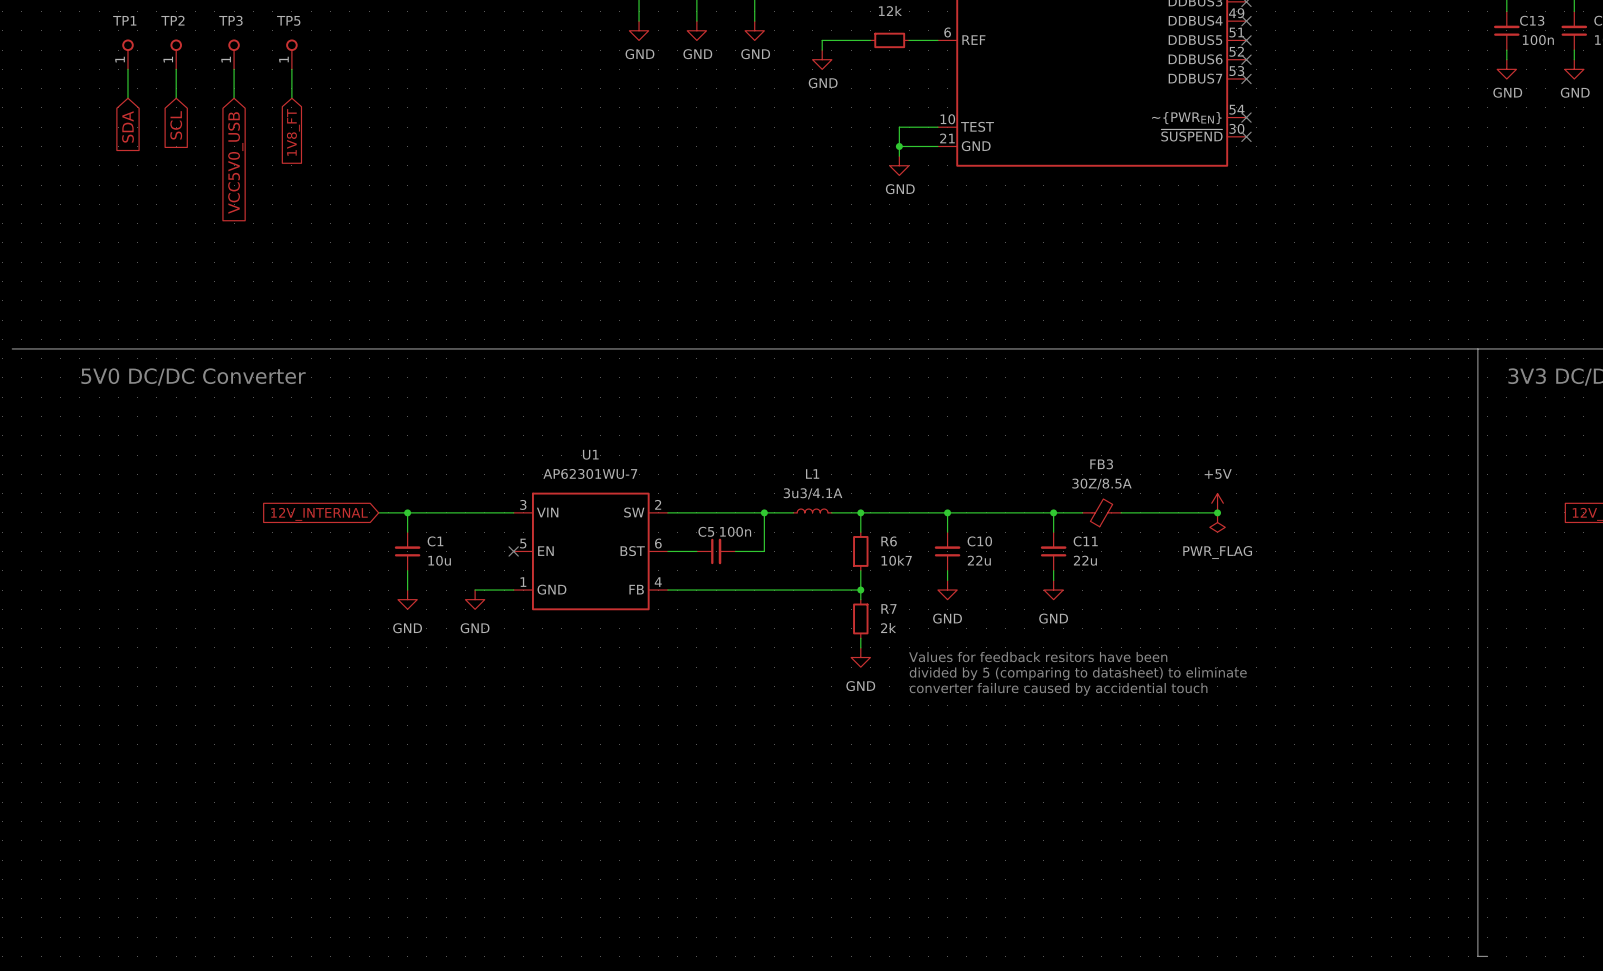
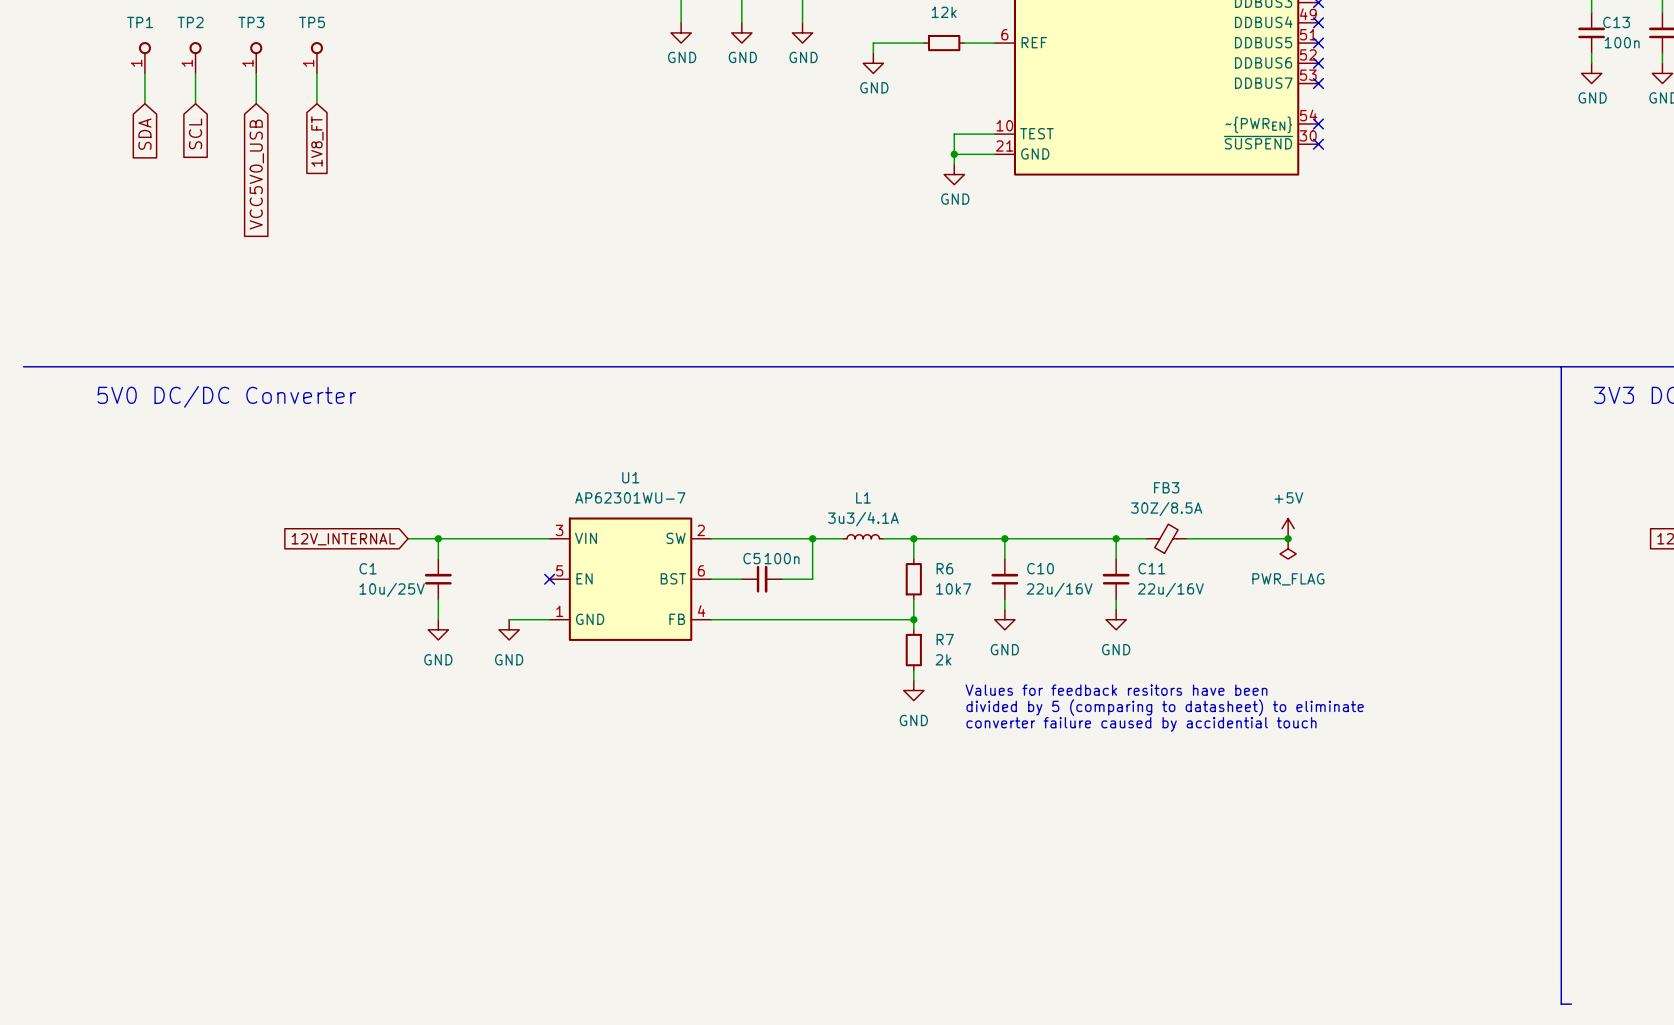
C1 name position: C1 (435, 541) -> C1 (368, 568)
C1 text: 10u (439, 560) -> 10u/25V (392, 589)
C10 text: 22u (979, 560) -> 22u/16V (1059, 589)
C11 text: 22u (1085, 560) -> 22u/16V (1170, 589)

